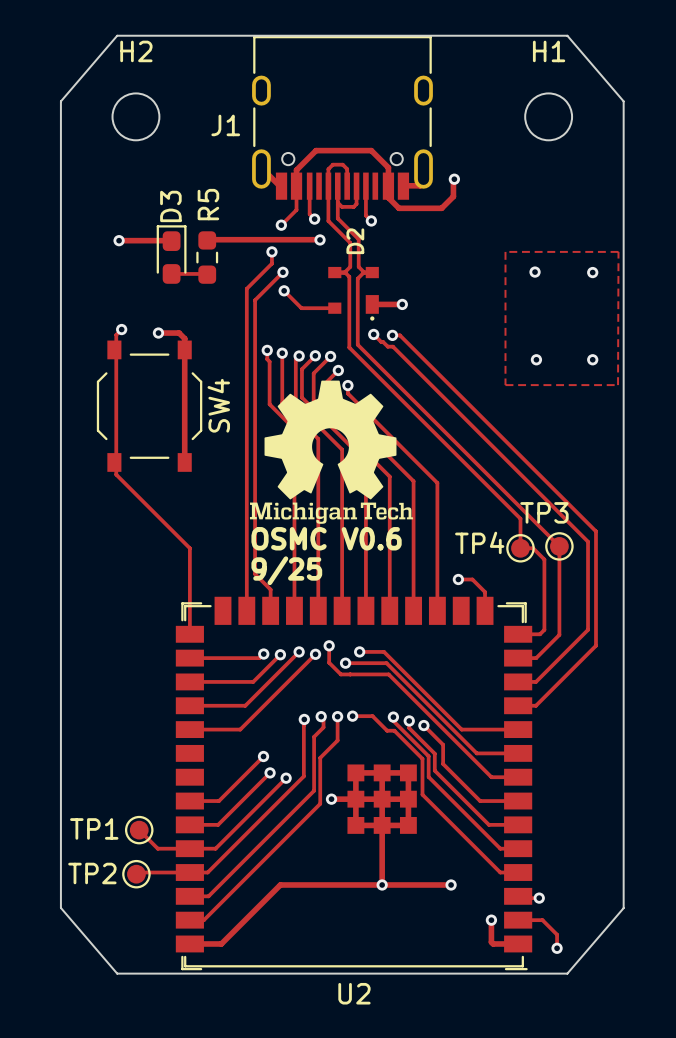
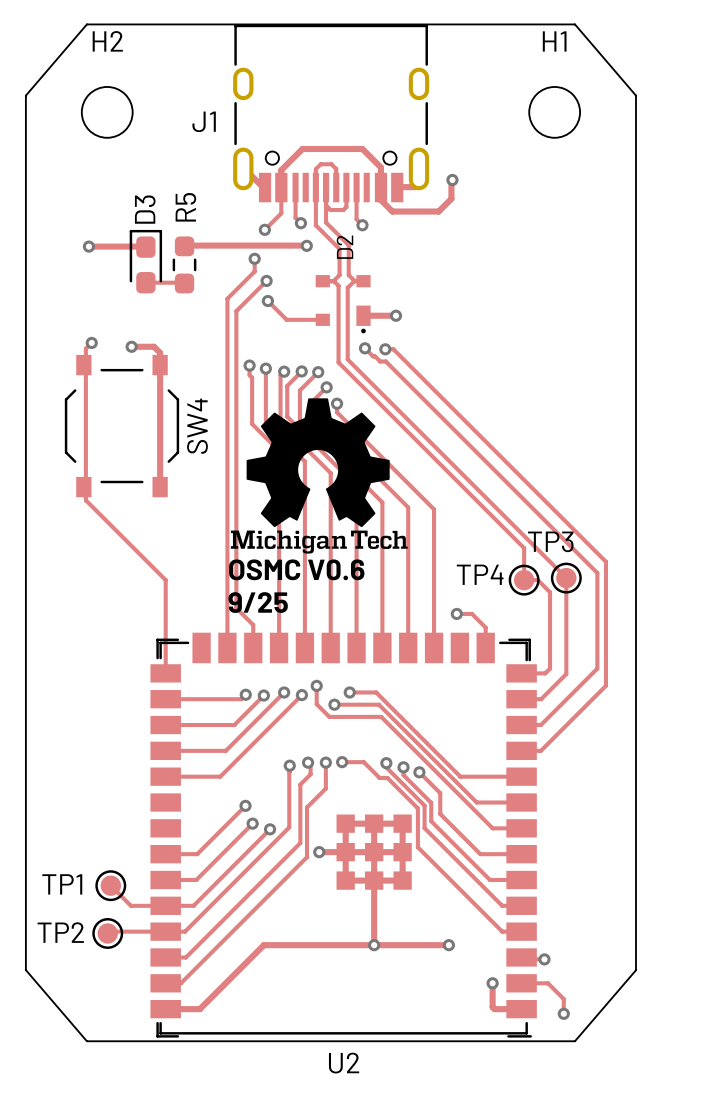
zone outline: (505, 251) (505, 385) (618, 385) (618, 251) (505, 251) -> none
via: (535, 272) -> none
via: (592, 272) -> none
via: (536, 359) -> none
via: (592, 359) -> none

